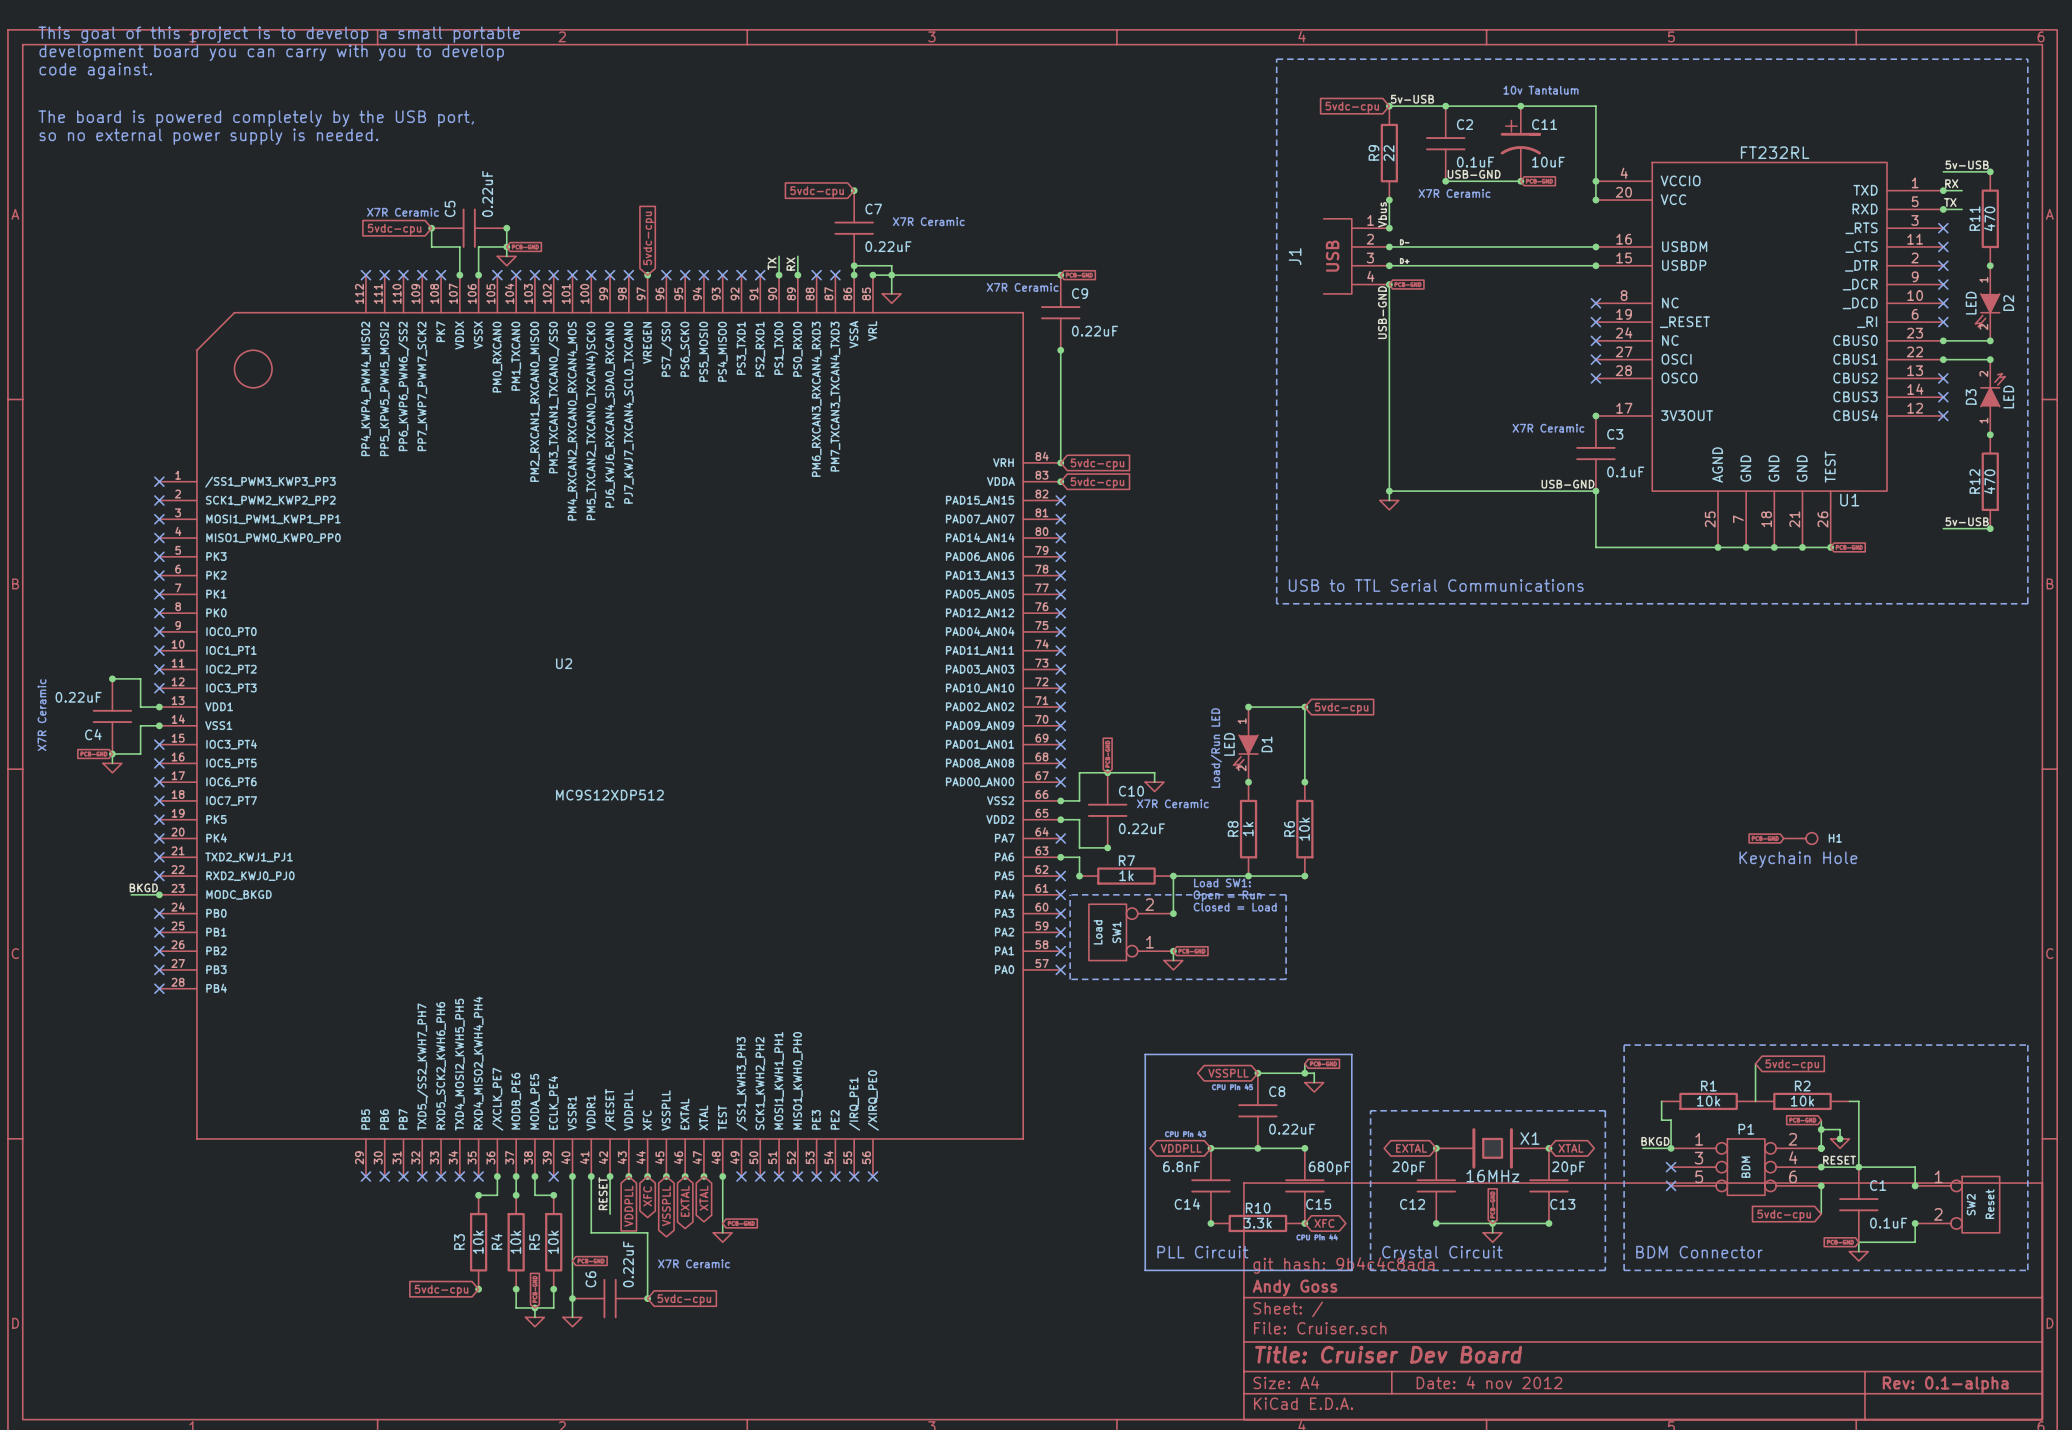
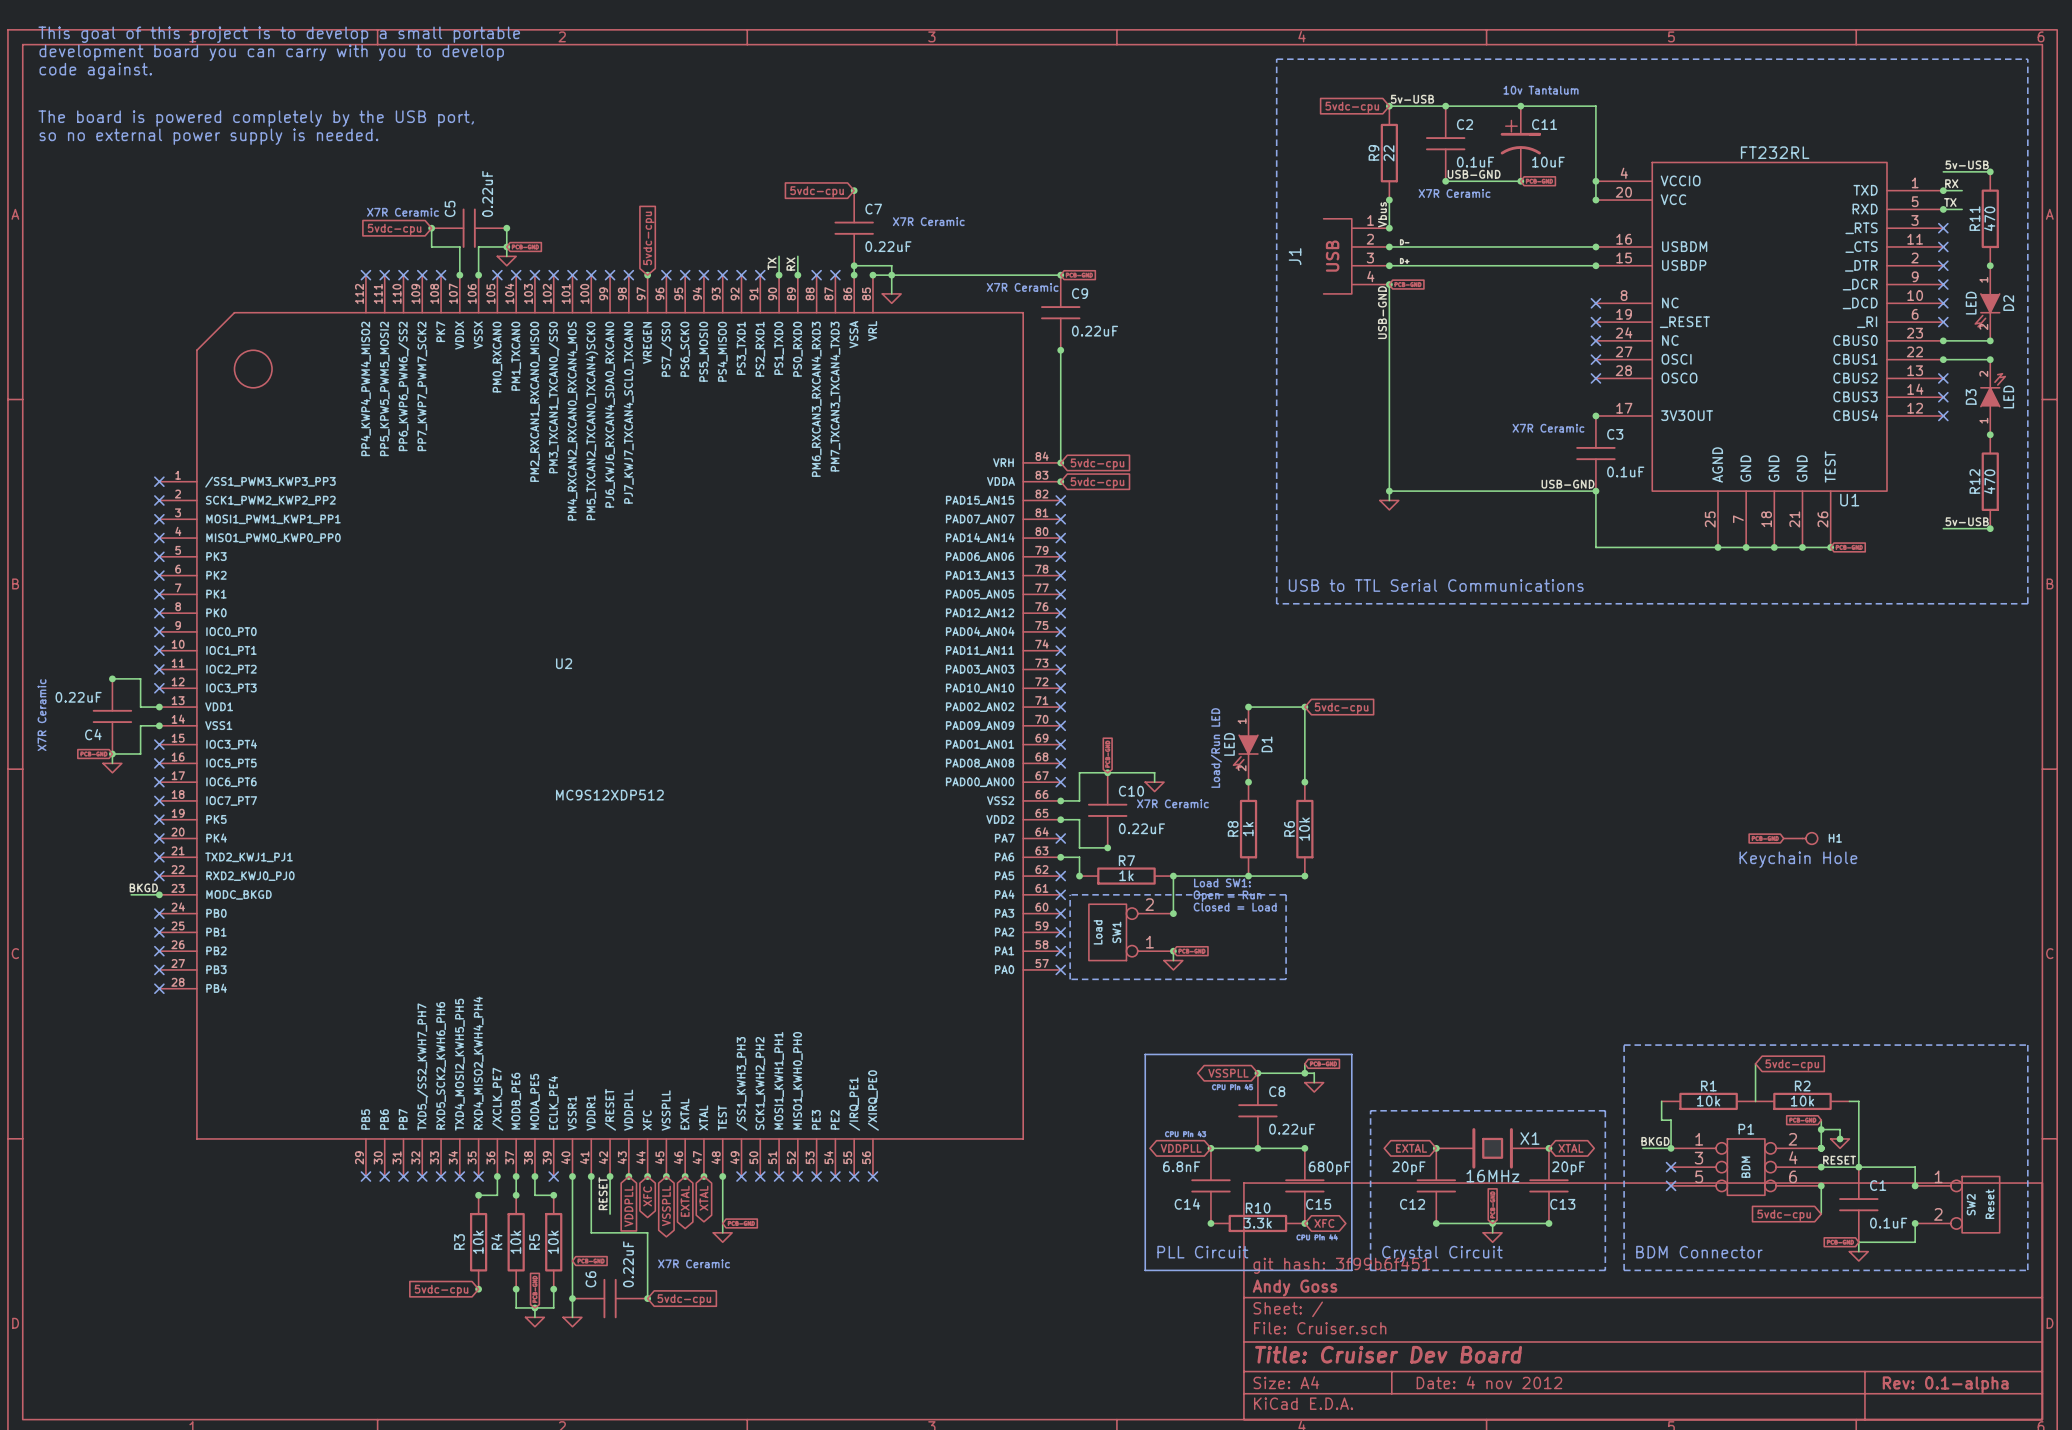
title block: git hash: 9b4c4c8ada (1343, 1265) -> git hash: 3f99b6f451 (1341, 1265)

